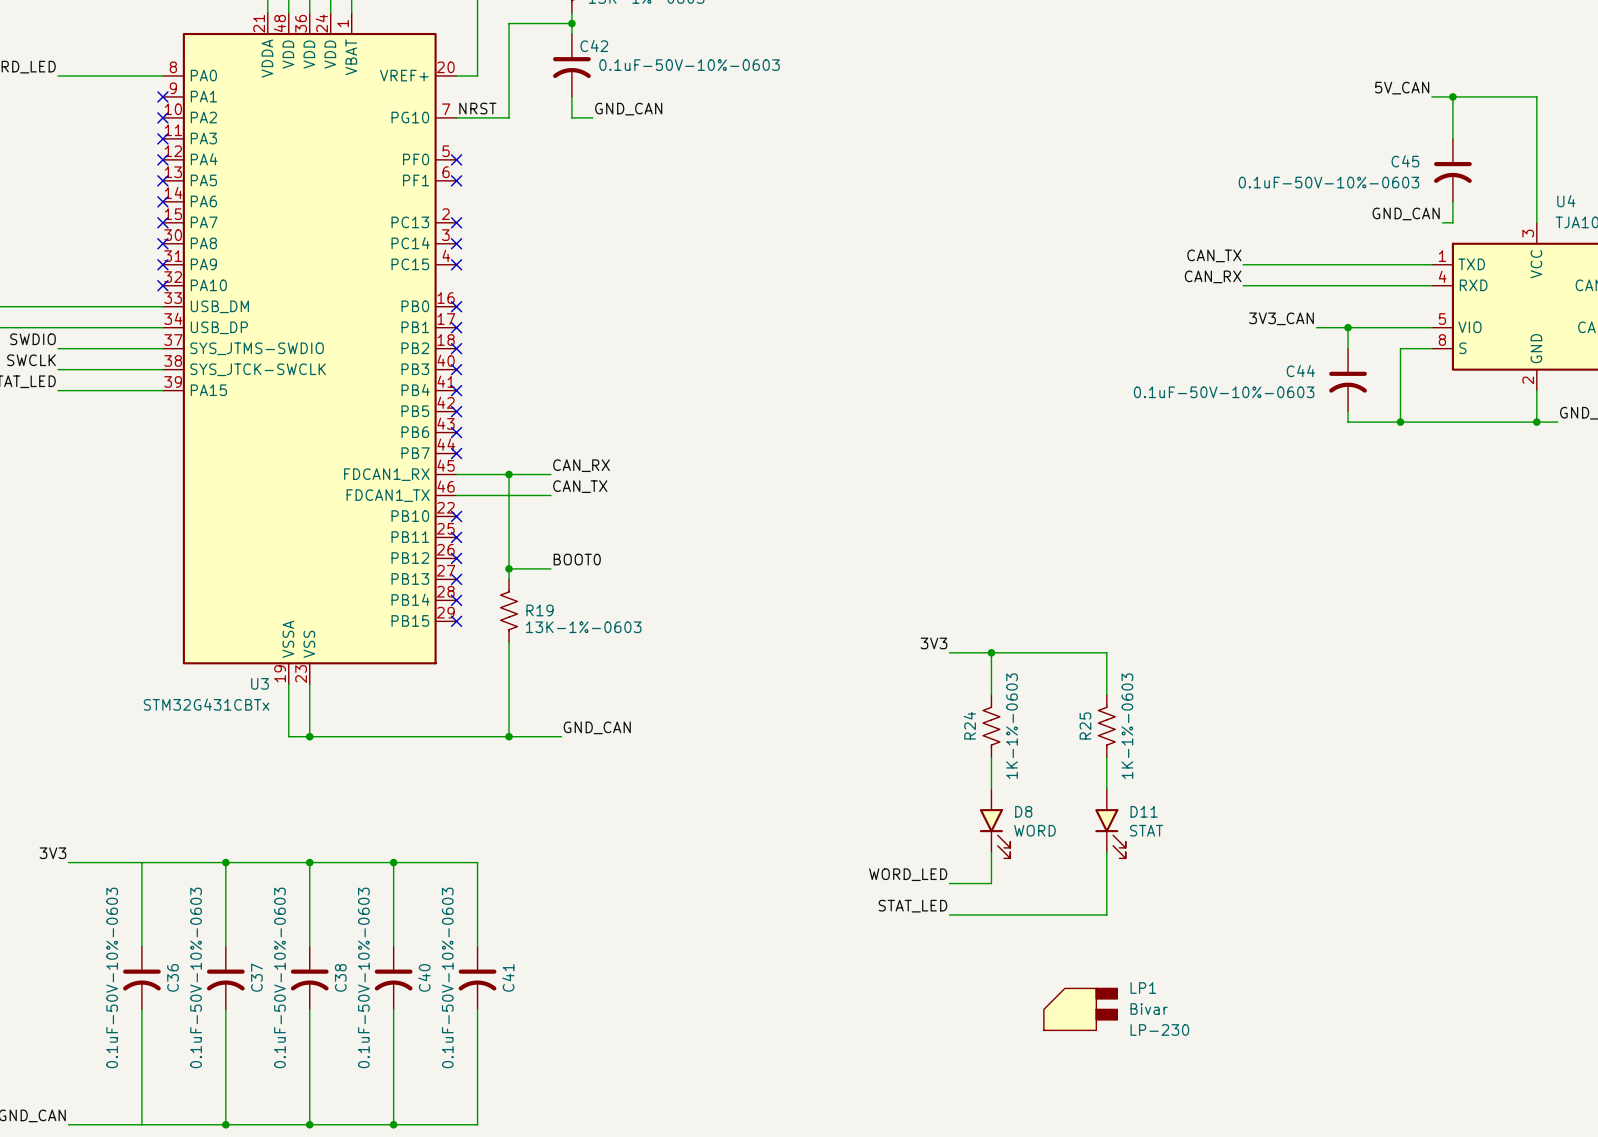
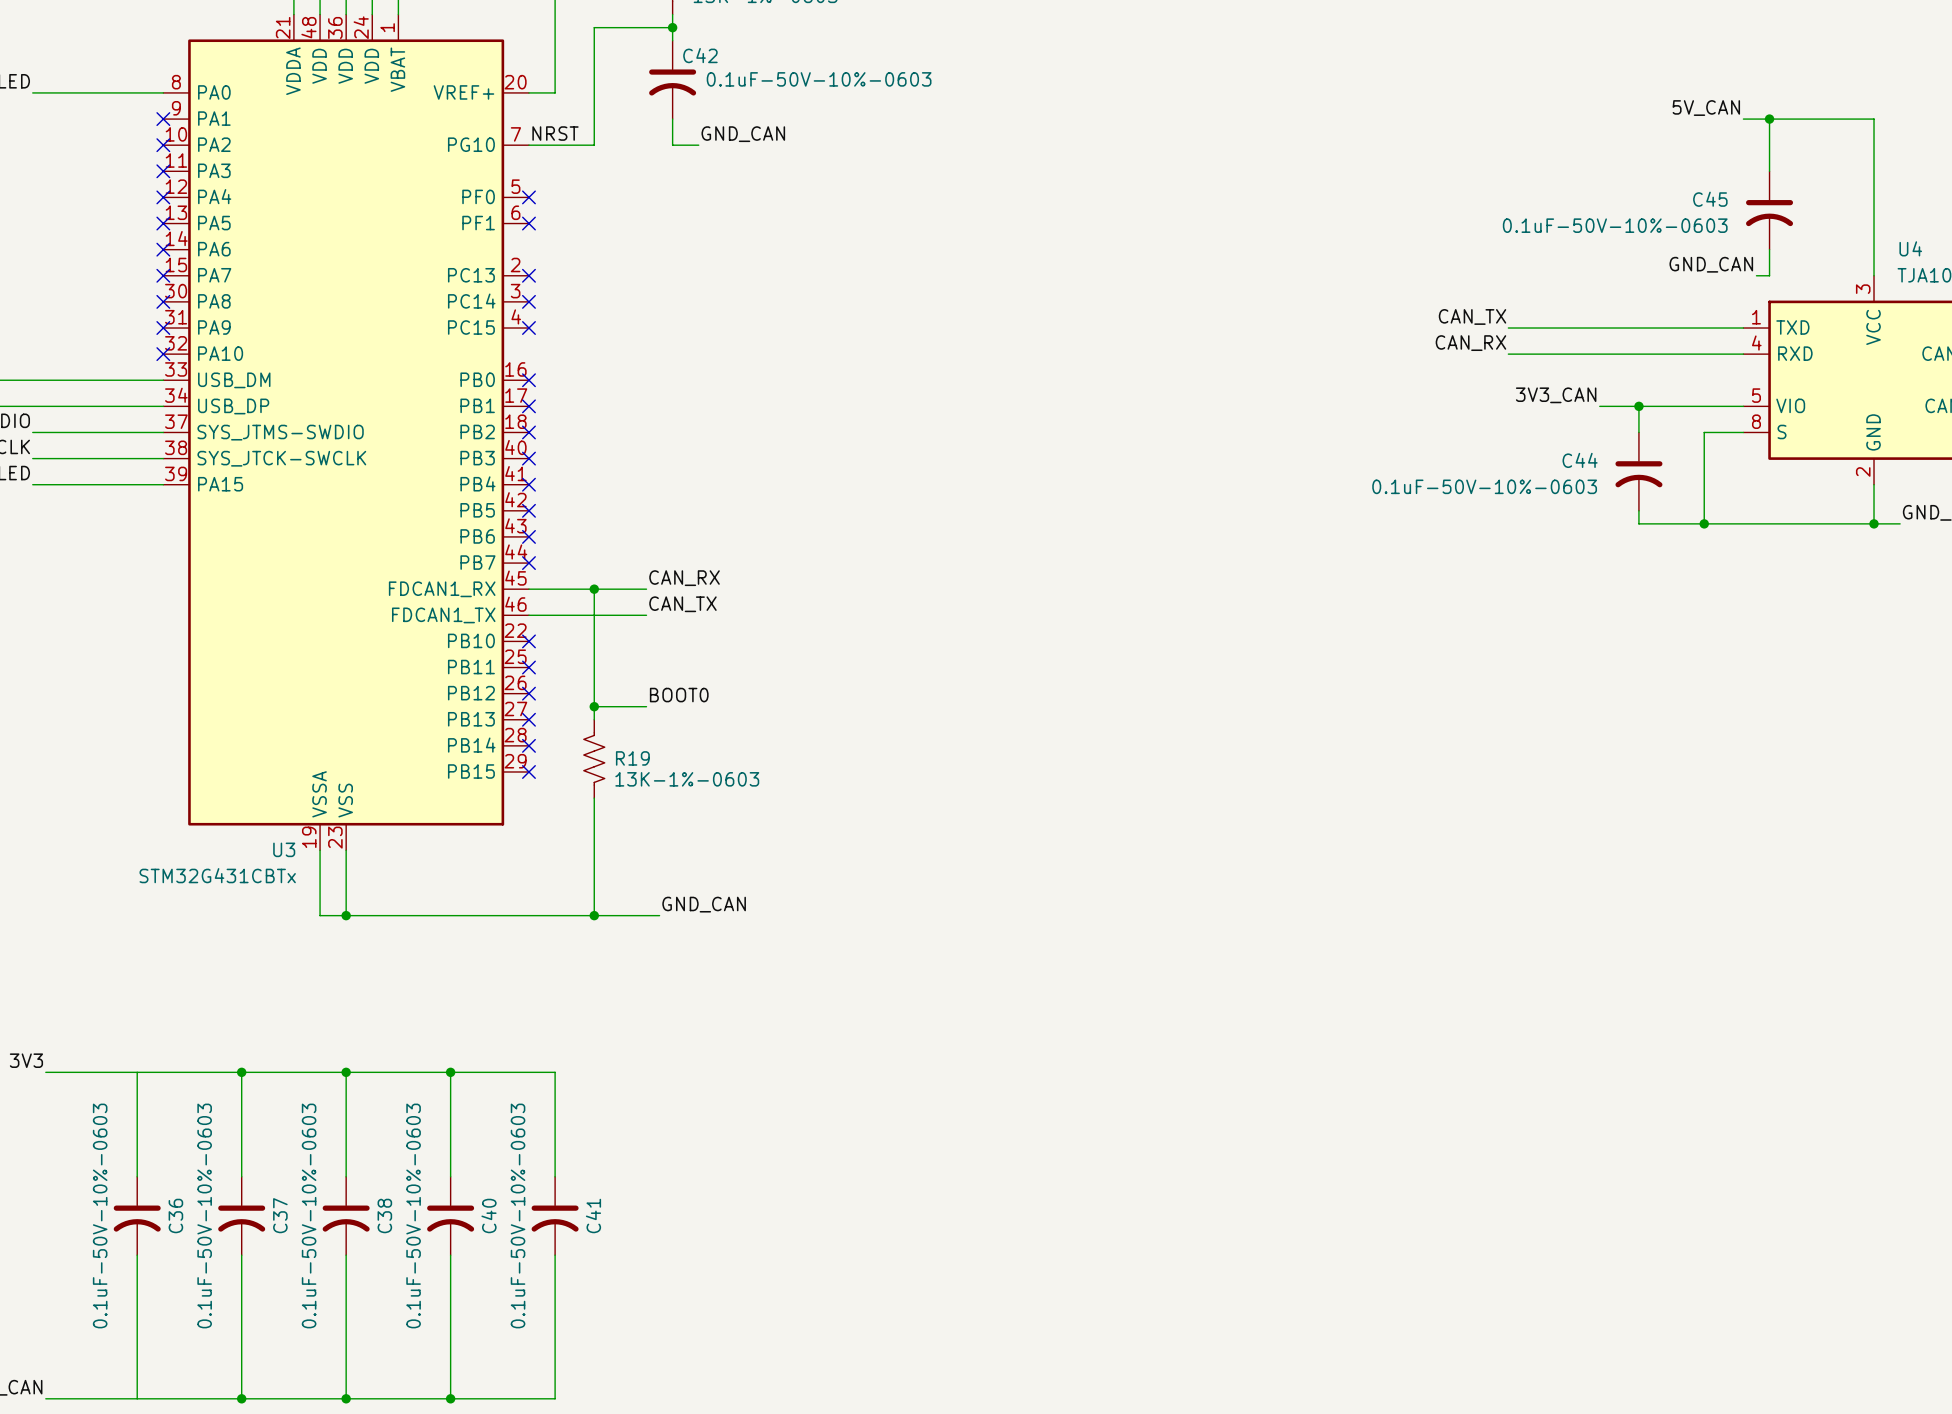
label: 3V3 (933, 643) -> none
wire: (949, 652) (1106, 652) (1106, 694) -> none
wire: (991, 652) (991, 694) -> none
junction: (991, 652) -> none
R24: 1K-1%-0603 (991, 726) -> none
R25: 1K-1%-0603 (1106, 726) -> none
wire: (991, 757) (991, 789) -> none
wire: (1106, 757) (1106, 789) -> none
D8: WORD (995, 823) -> none
D11: STAT (1110, 823) -> none
wire: (991, 852) (991, 883) (949, 883) -> none
wire: (1106, 852) (1106, 915) (949, 915) -> none
label: WORD_LED (908, 874) -> none
label: STAT_LED (912, 906) -> none
LP1: (1080, 1009) -> none

